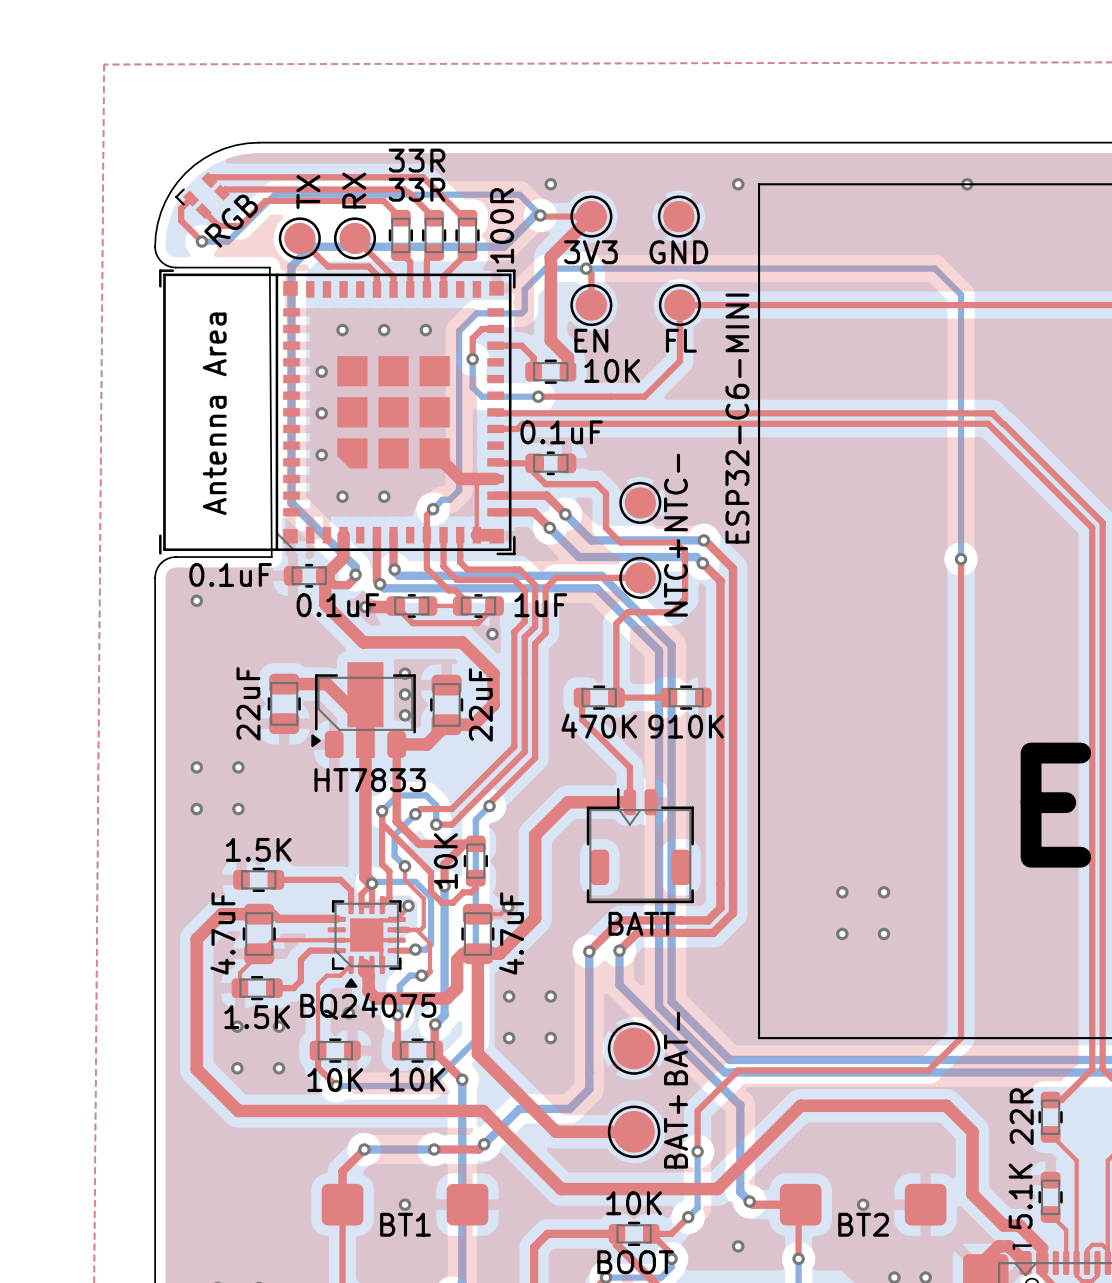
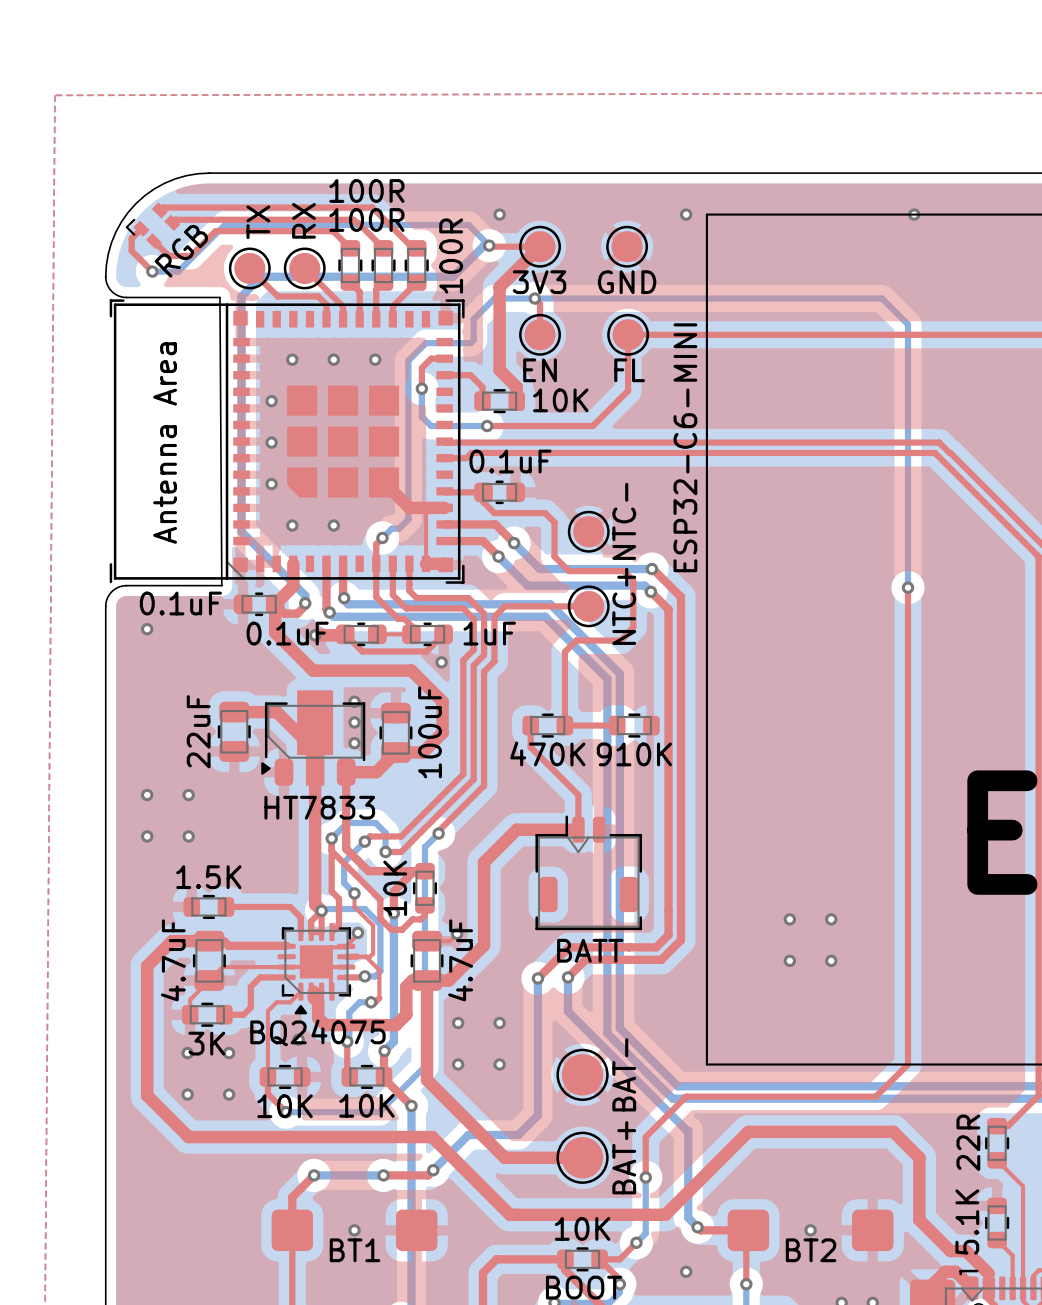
part value: 33R (417, 160) -> 100R (366, 190)
part value: 33R (417, 189) -> 100R (366, 220)
part value: 22uF (480, 704) -> 100uF (430, 732)
part value: 1.5K (257, 1017) -> 3K (206, 1043)

